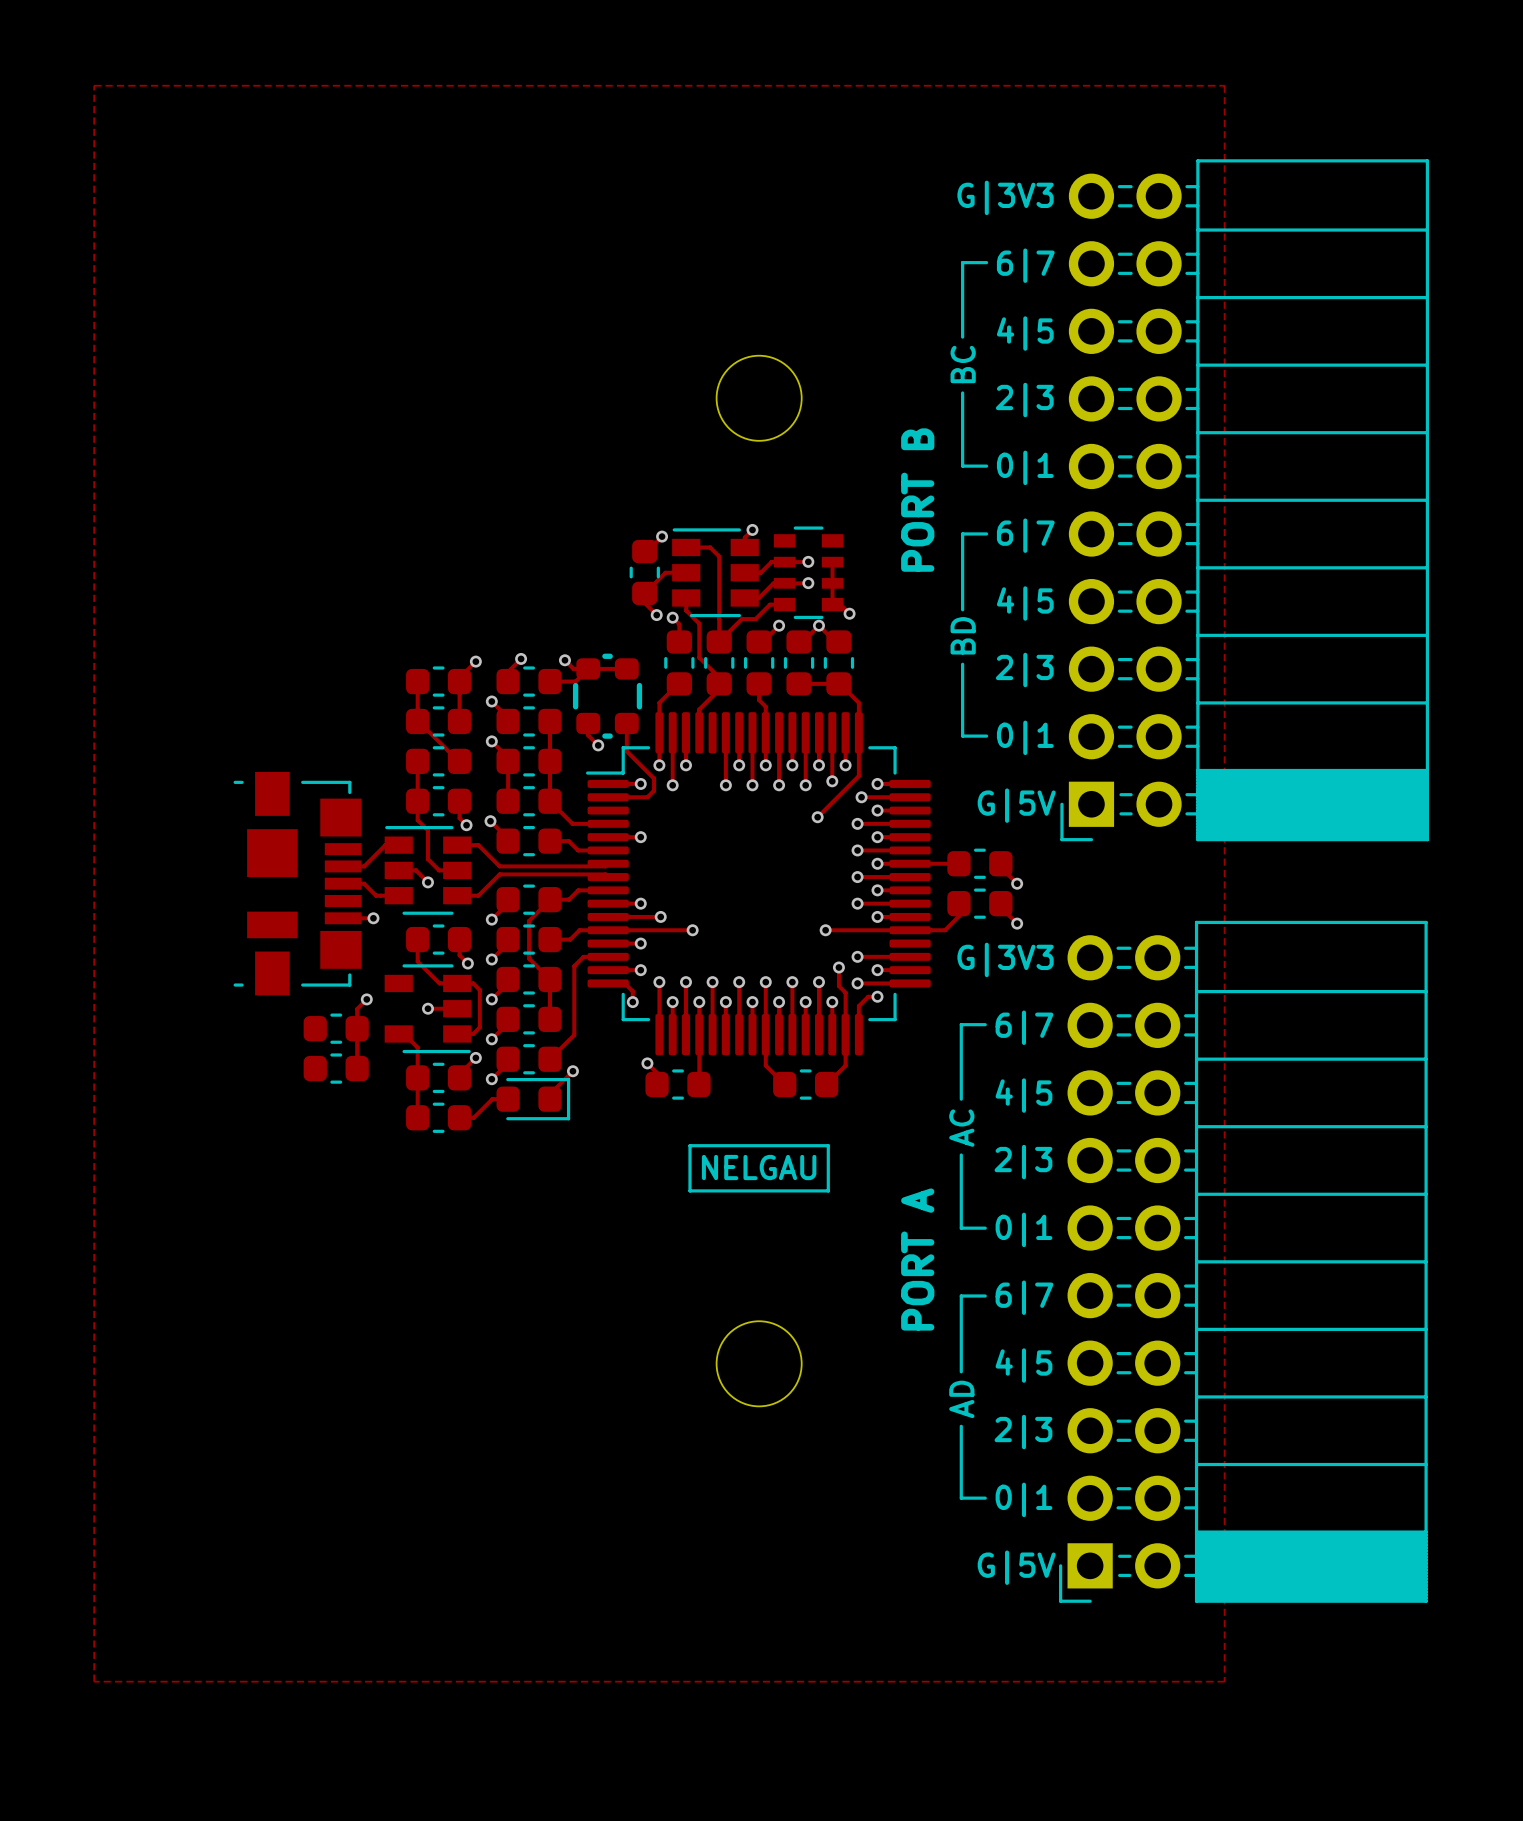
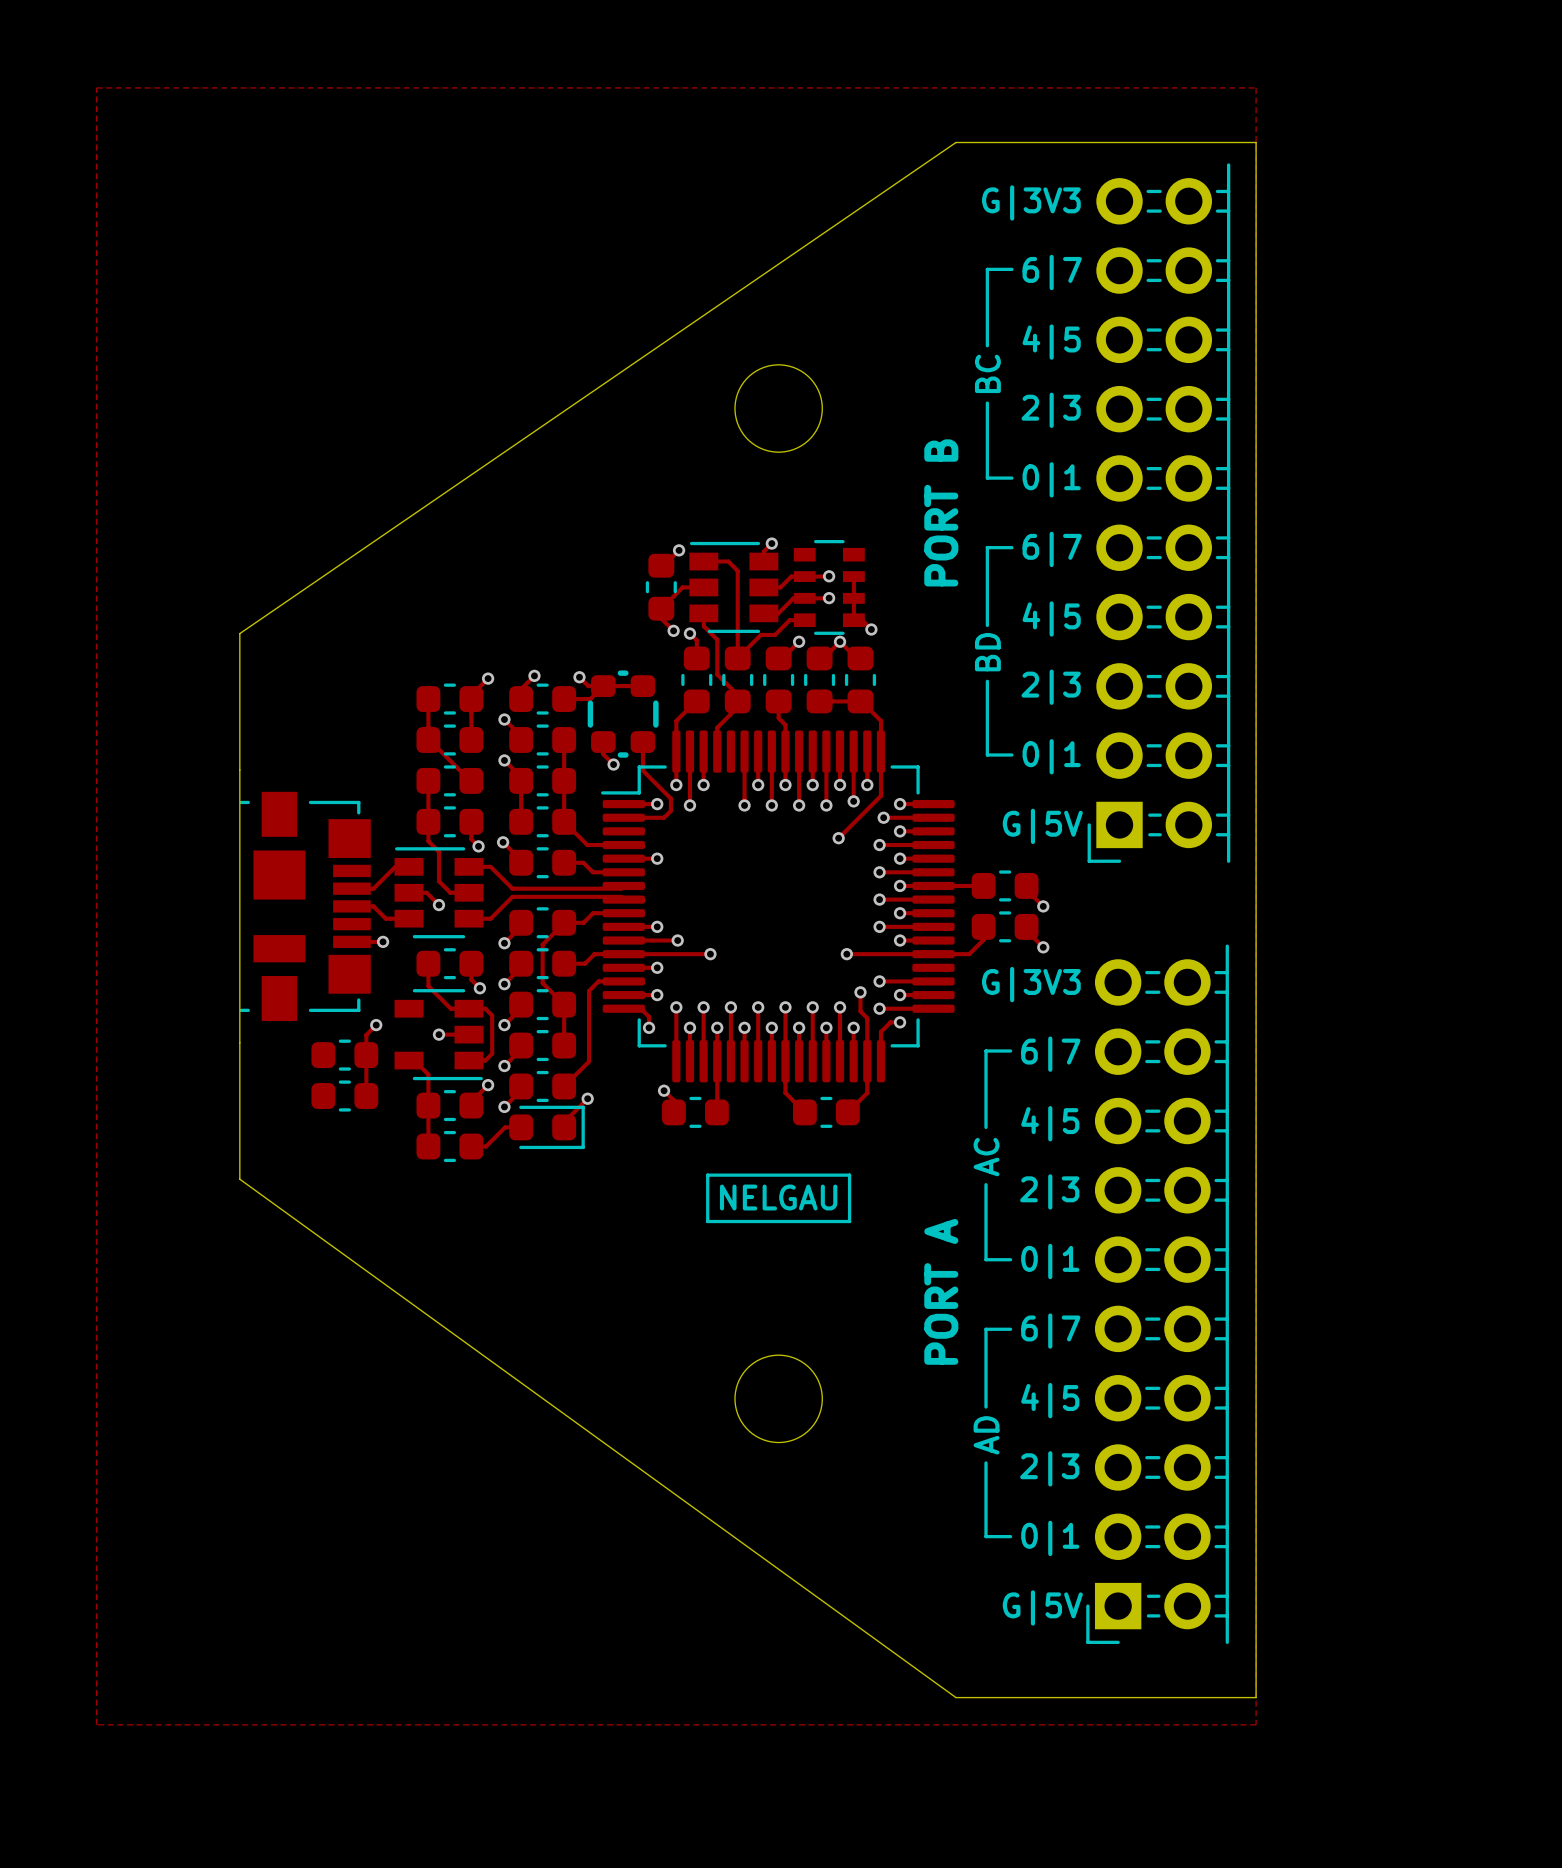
board edge: none -> (955, 142) (239, 633) (239, 1179) (955, 1697) (1256, 1697) (1256, 142) (955, 142)
part: none -> (1158, 513)
part: (1244, 500) -> none
part: none -> (1157, 1294)
part: (1243, 1261) -> none

